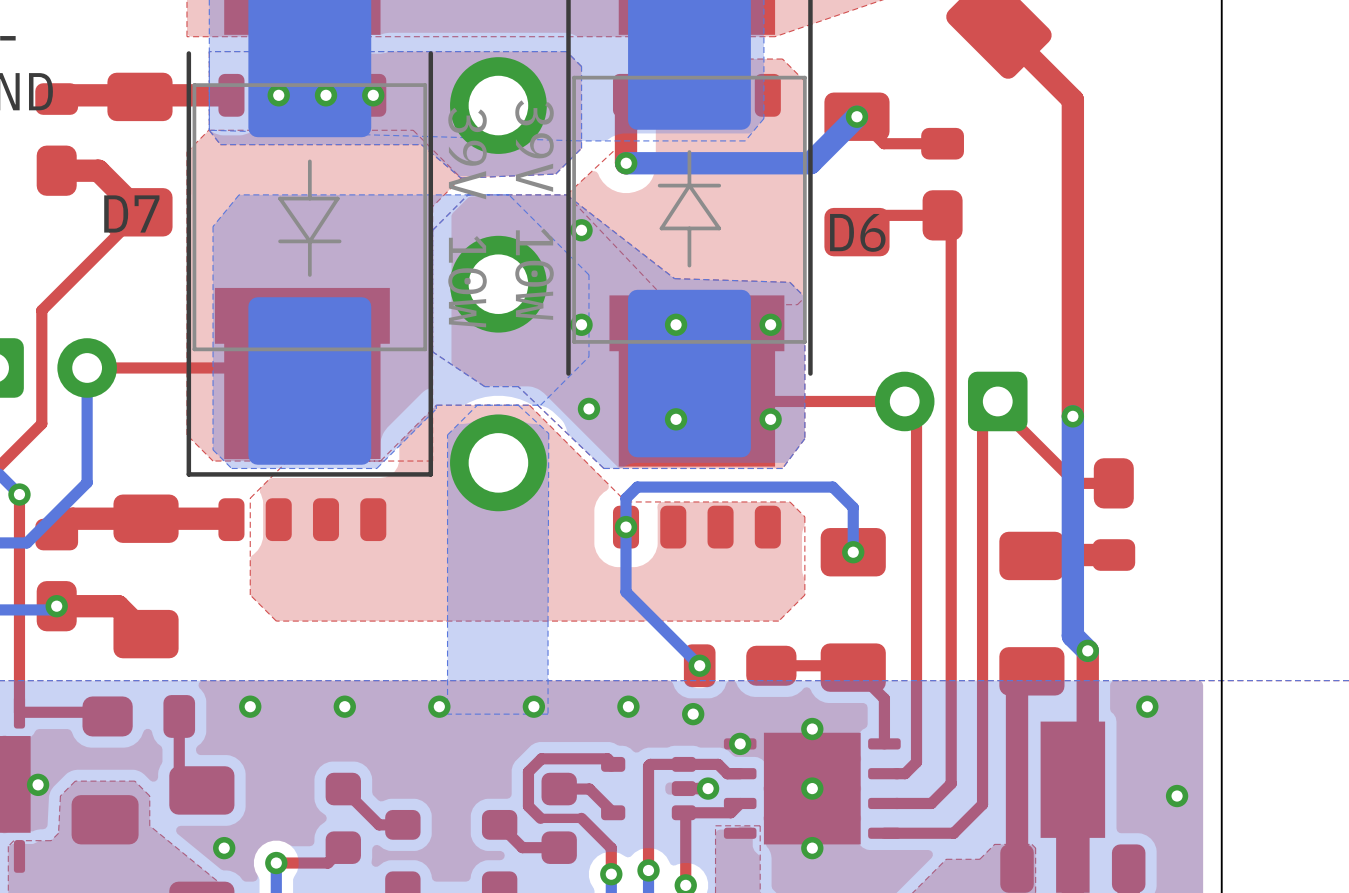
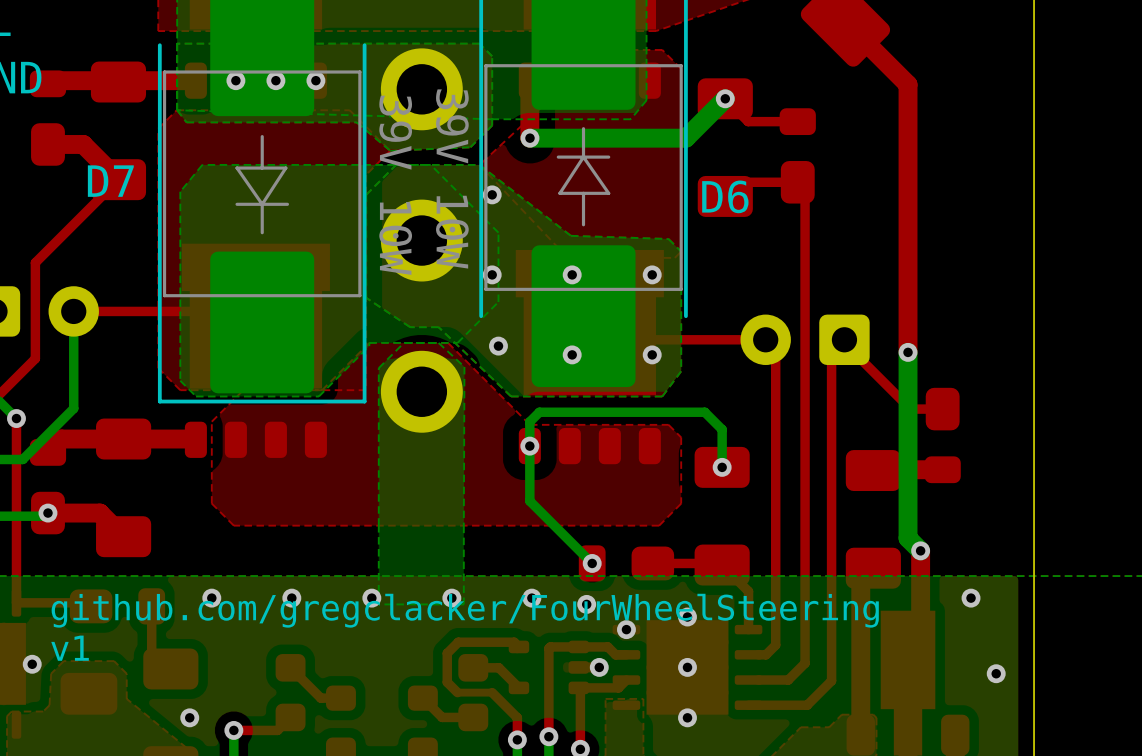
text: none -> github.com/gregclacker/FourWheelSteering (465, 610)
text: none -> v1 (70, 648)

